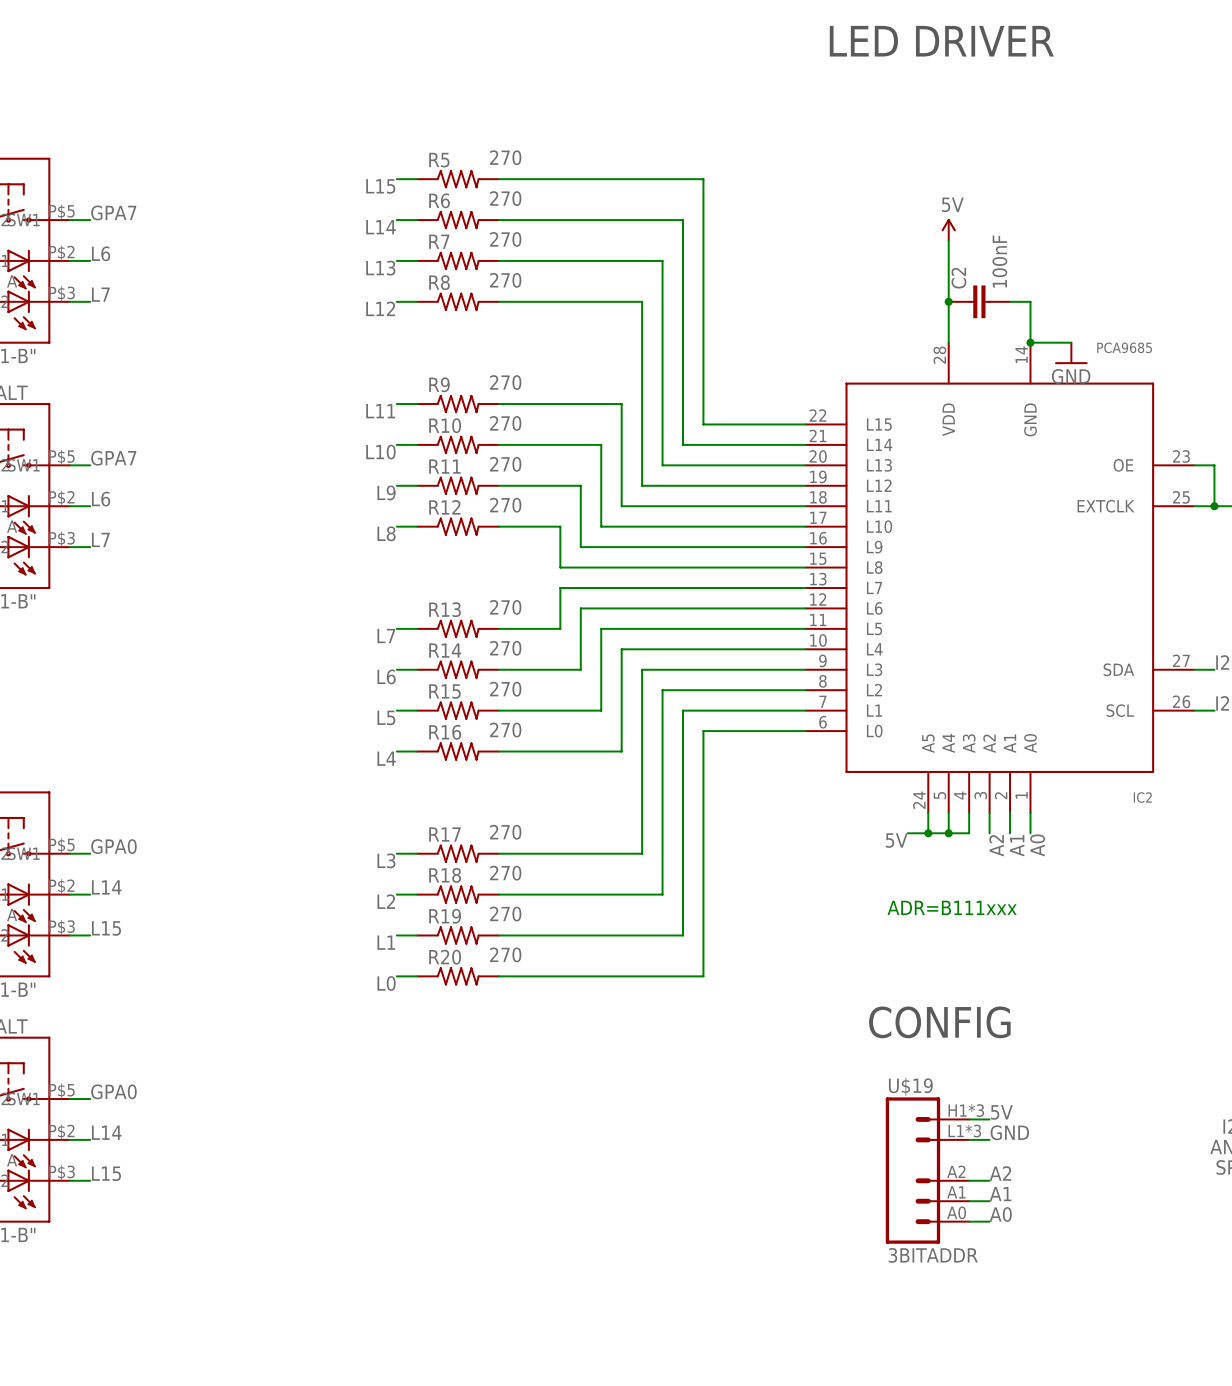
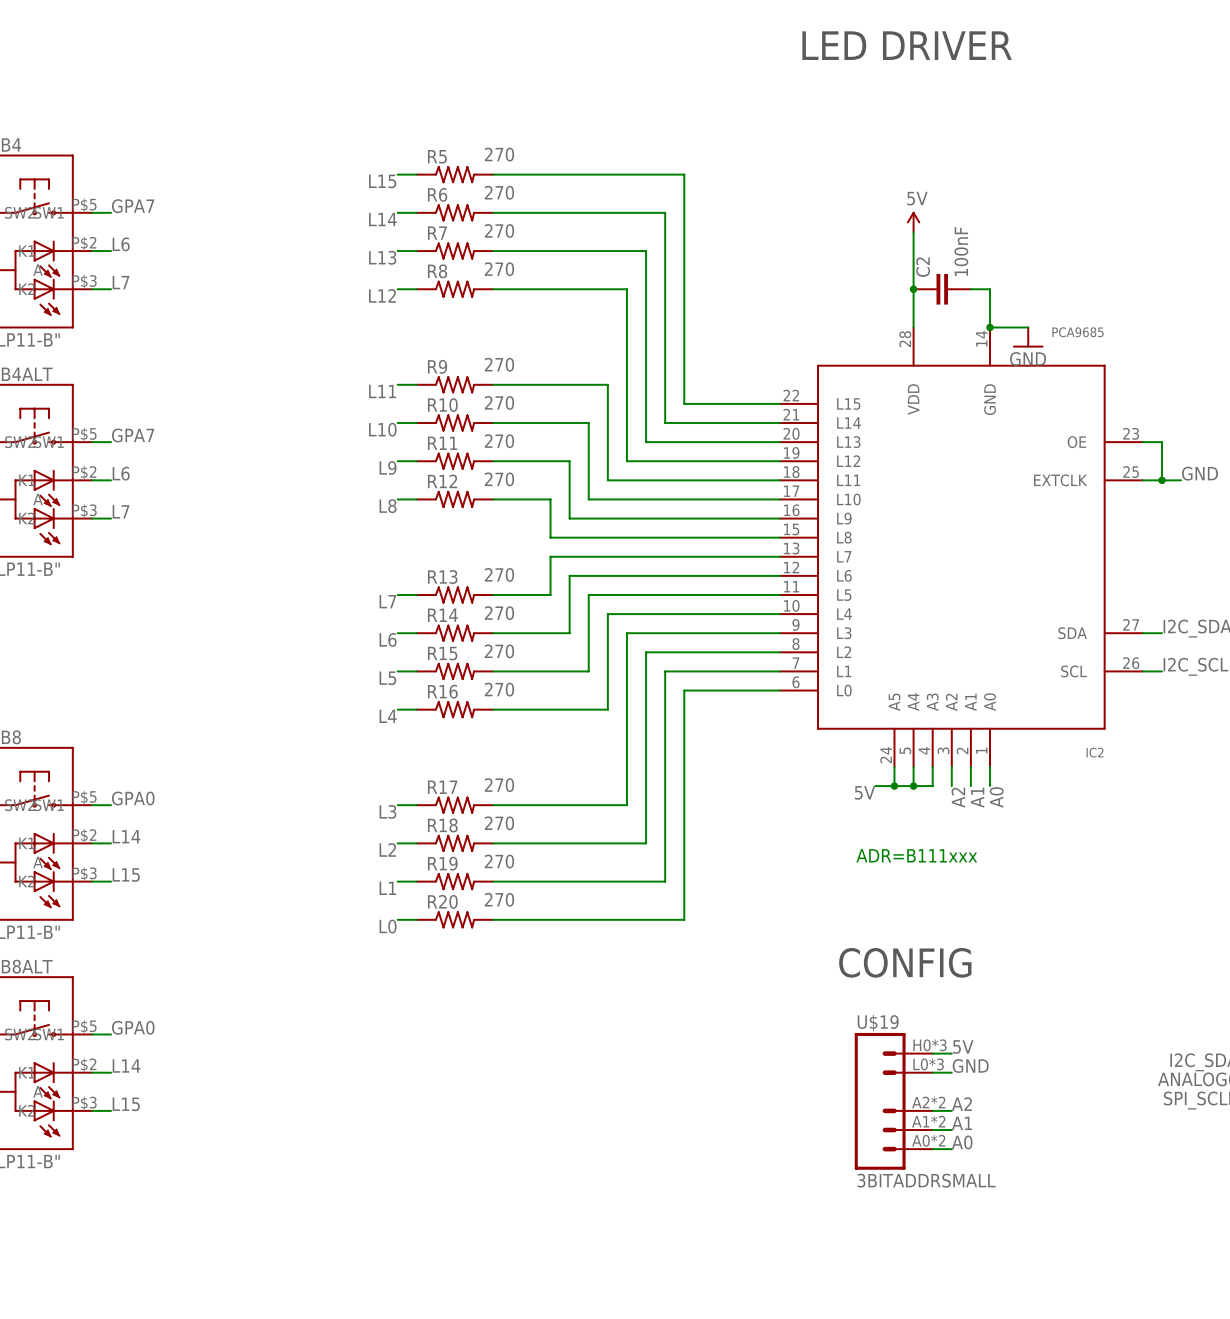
U$19 pin number: H1*3 (966, 1110) -> H0*3 (929, 1045)
U$19 pin number: L1*3 (964, 1131) -> L0*3 (928, 1064)
U$19 pin number: A2 (956, 1171) -> A2*2 (928, 1102)
U$19 pin number: A1 (956, 1192) -> A1*2 (928, 1121)
U$19 pin number: A0 (956, 1212) -> A0*2 (928, 1140)
U$19 value: 3BITADDR (933, 1255) -> 3BITADDRSMALL (926, 1180)

